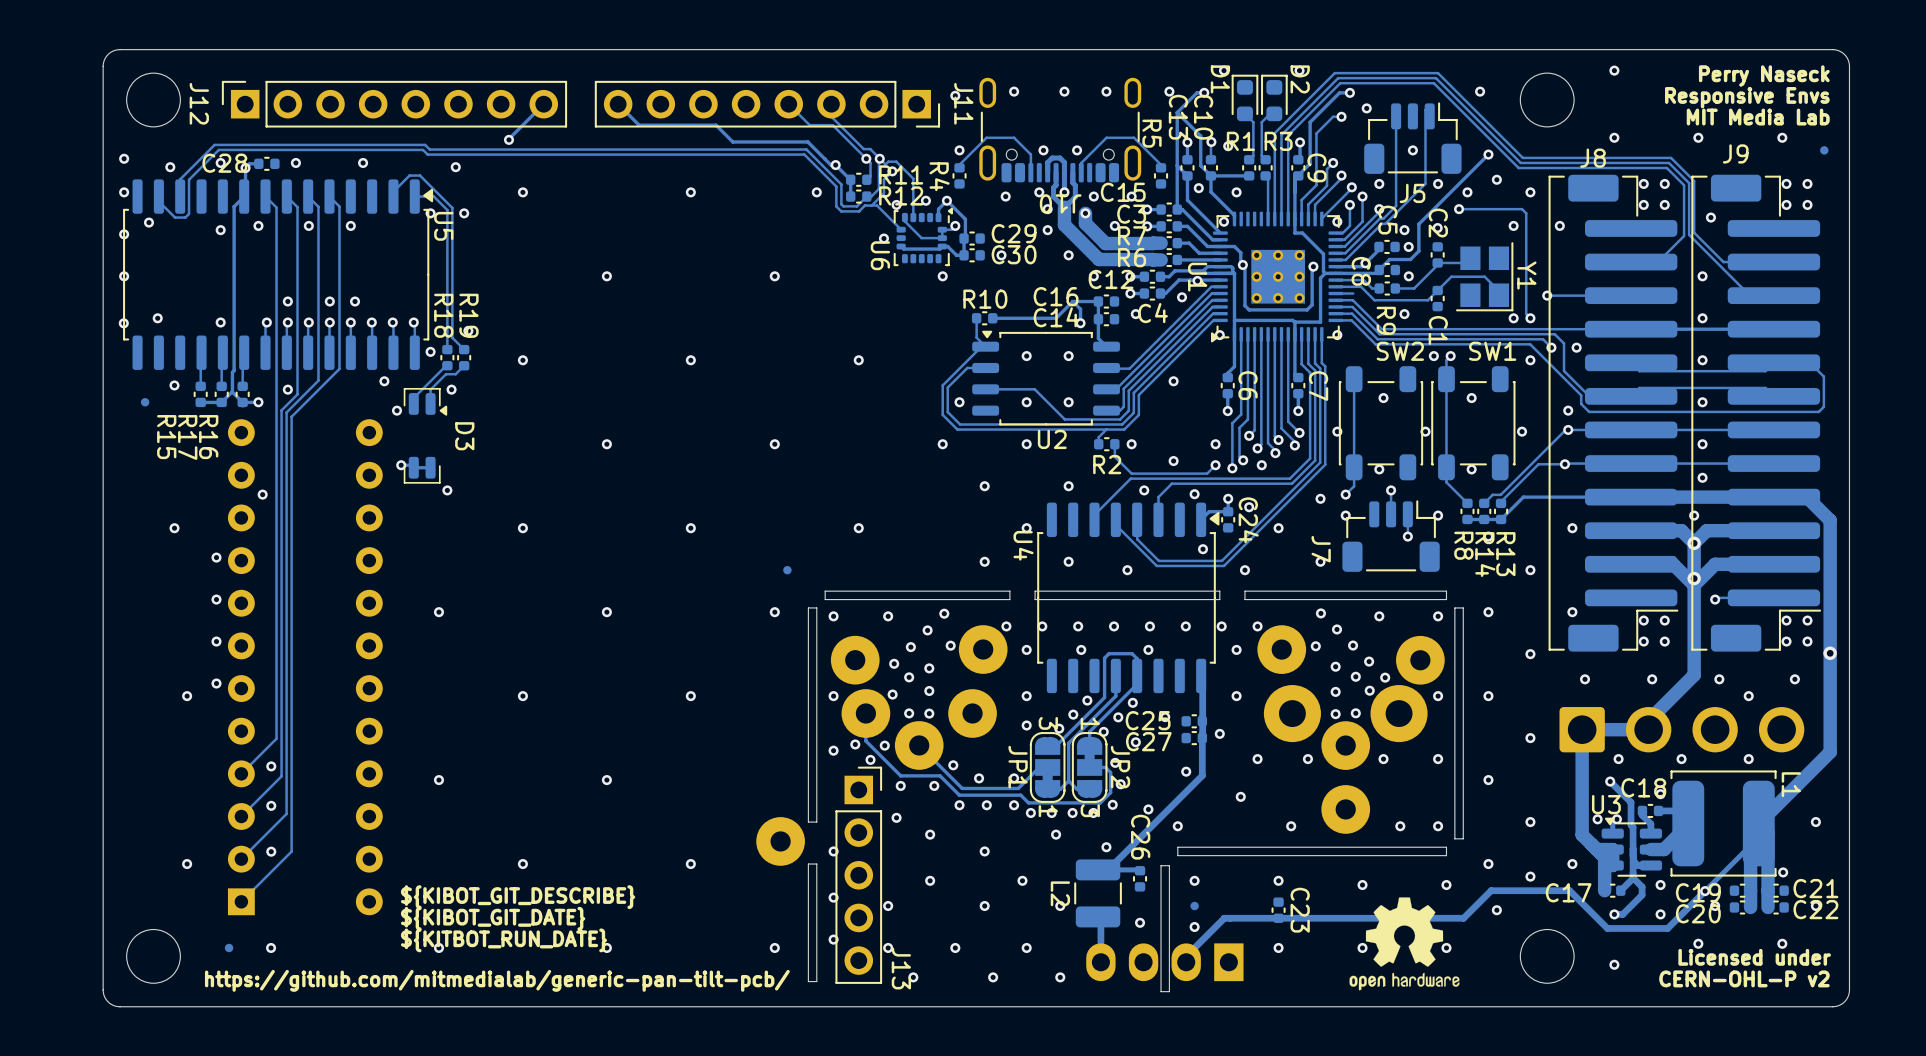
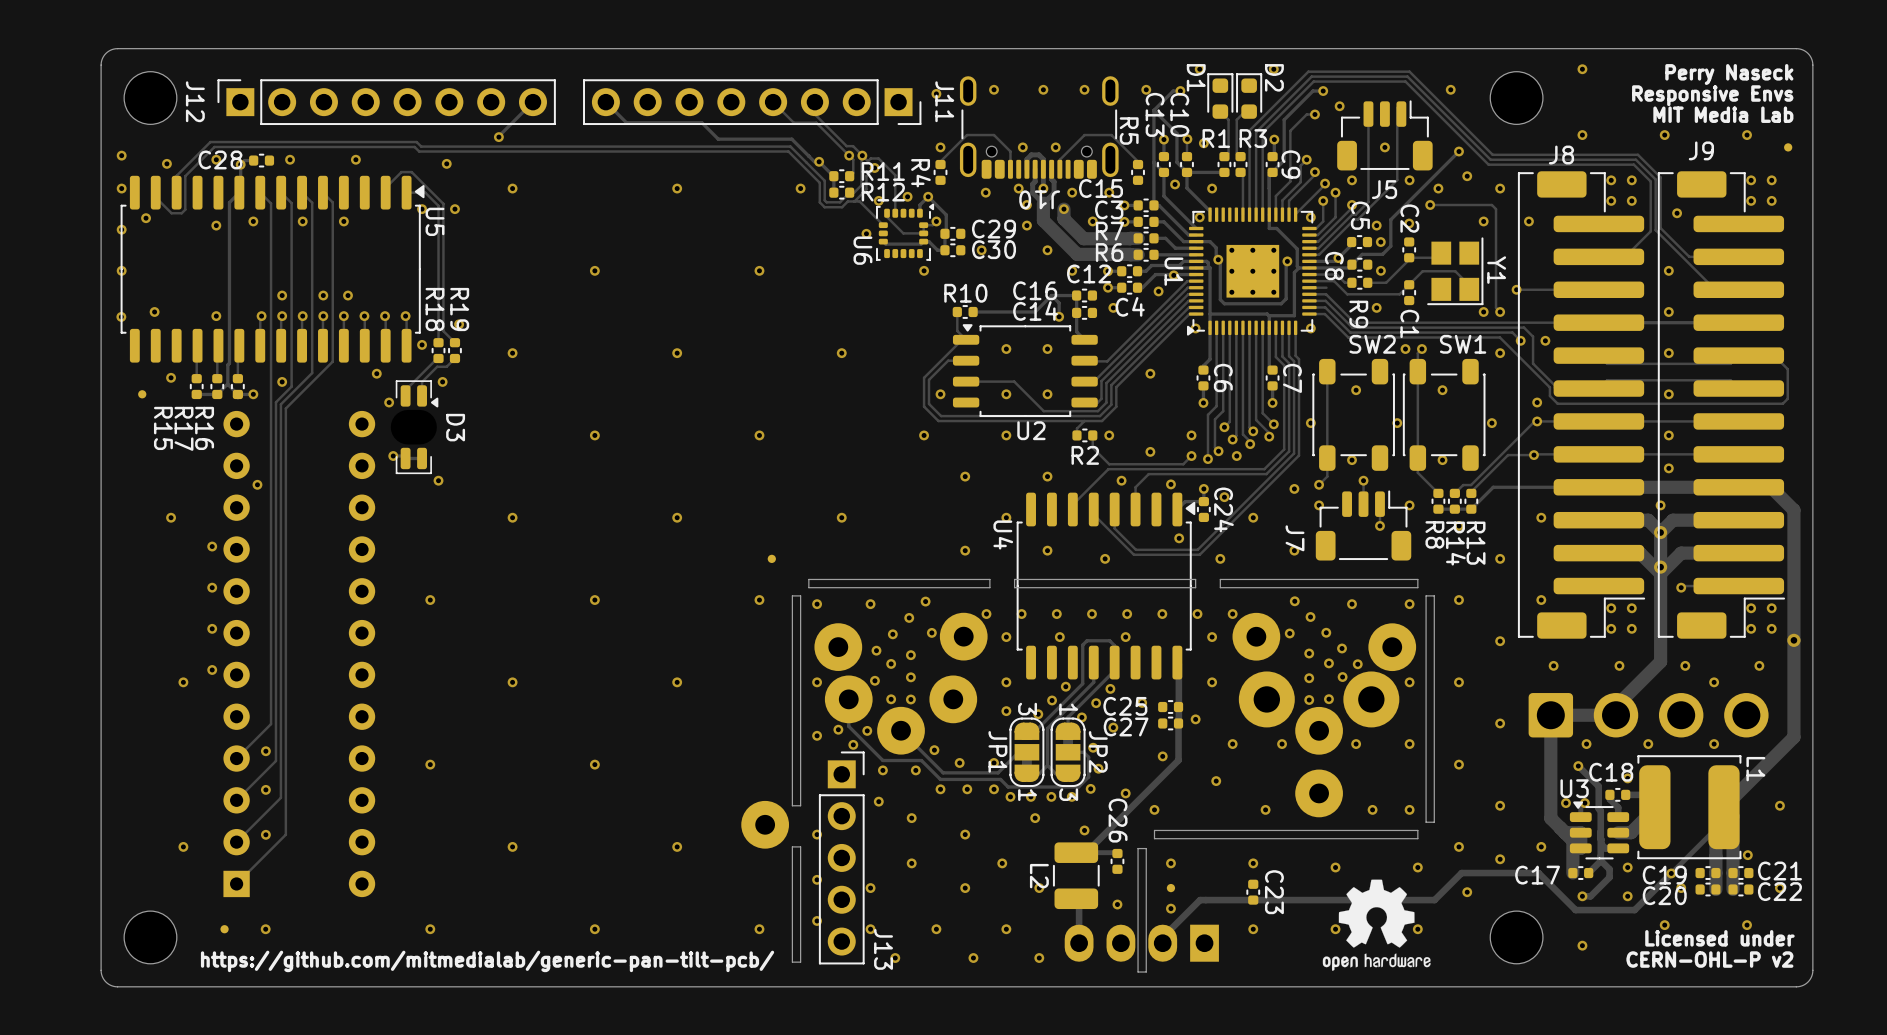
text: ${KIBOT_GIT_DESCRIBE} (518, 897) -> none
text: ${KIBOT_GIT_DATE} (493, 918) -> none
text: ${KITBOT_RUN_DATE} (503, 940) -> none

